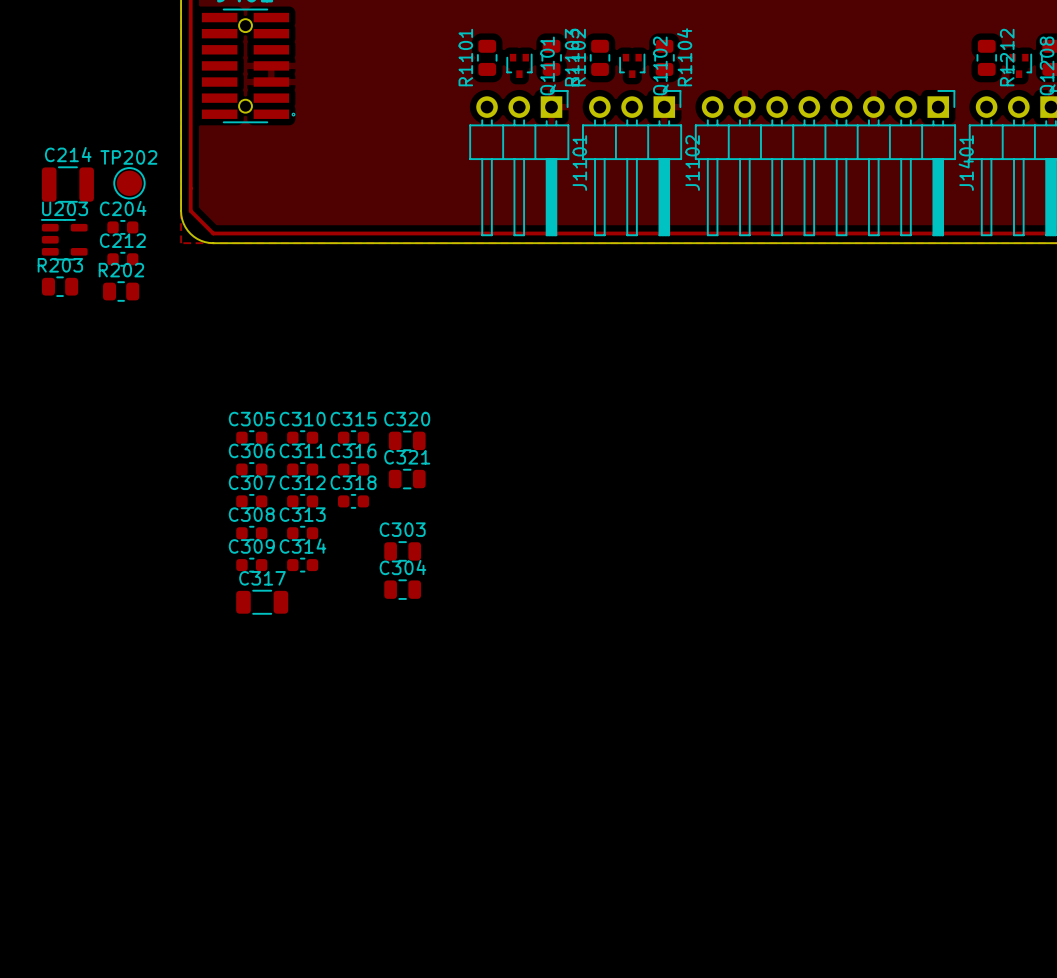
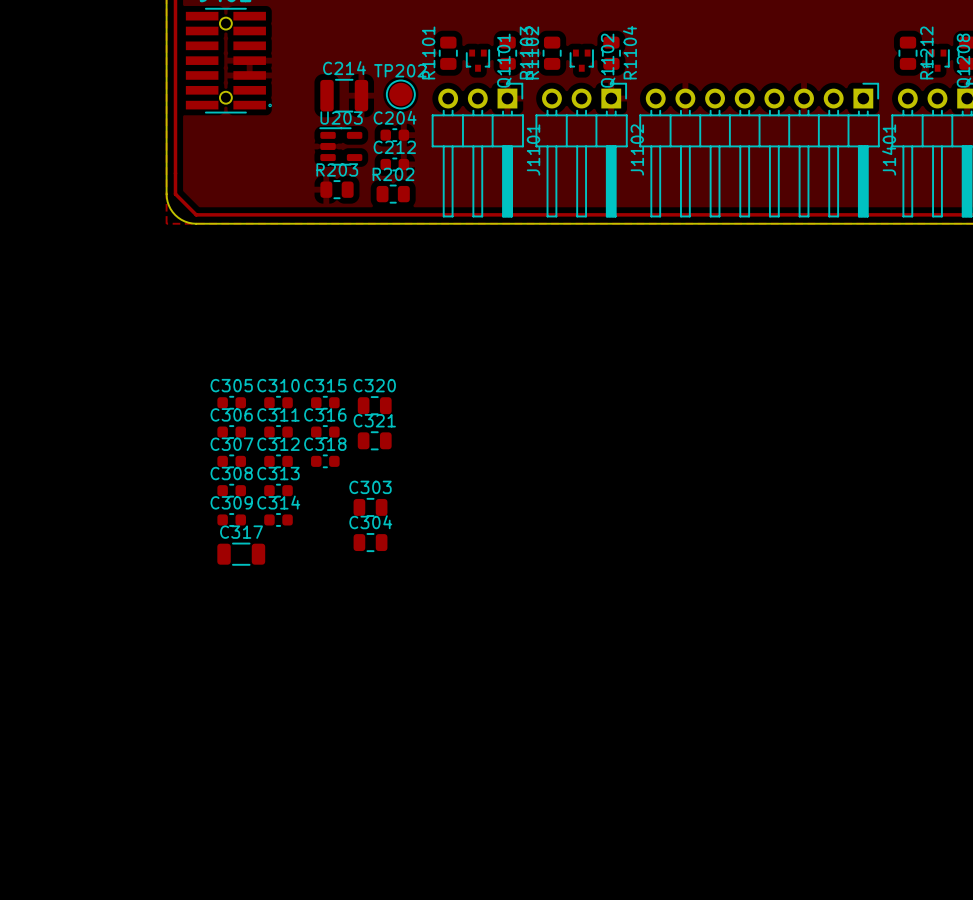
TP202 position: (129, 183) -> (400, 94)
C214 position: (67, 184) -> (344, 95)
C204 position: (122, 227) -> (394, 135)
U203 position: (64, 239) -> (340, 146)
C212 position: (122, 259) -> (394, 164)
R203 position: (60, 286) -> (337, 189)
R202 position: (121, 291) -> (393, 194)

